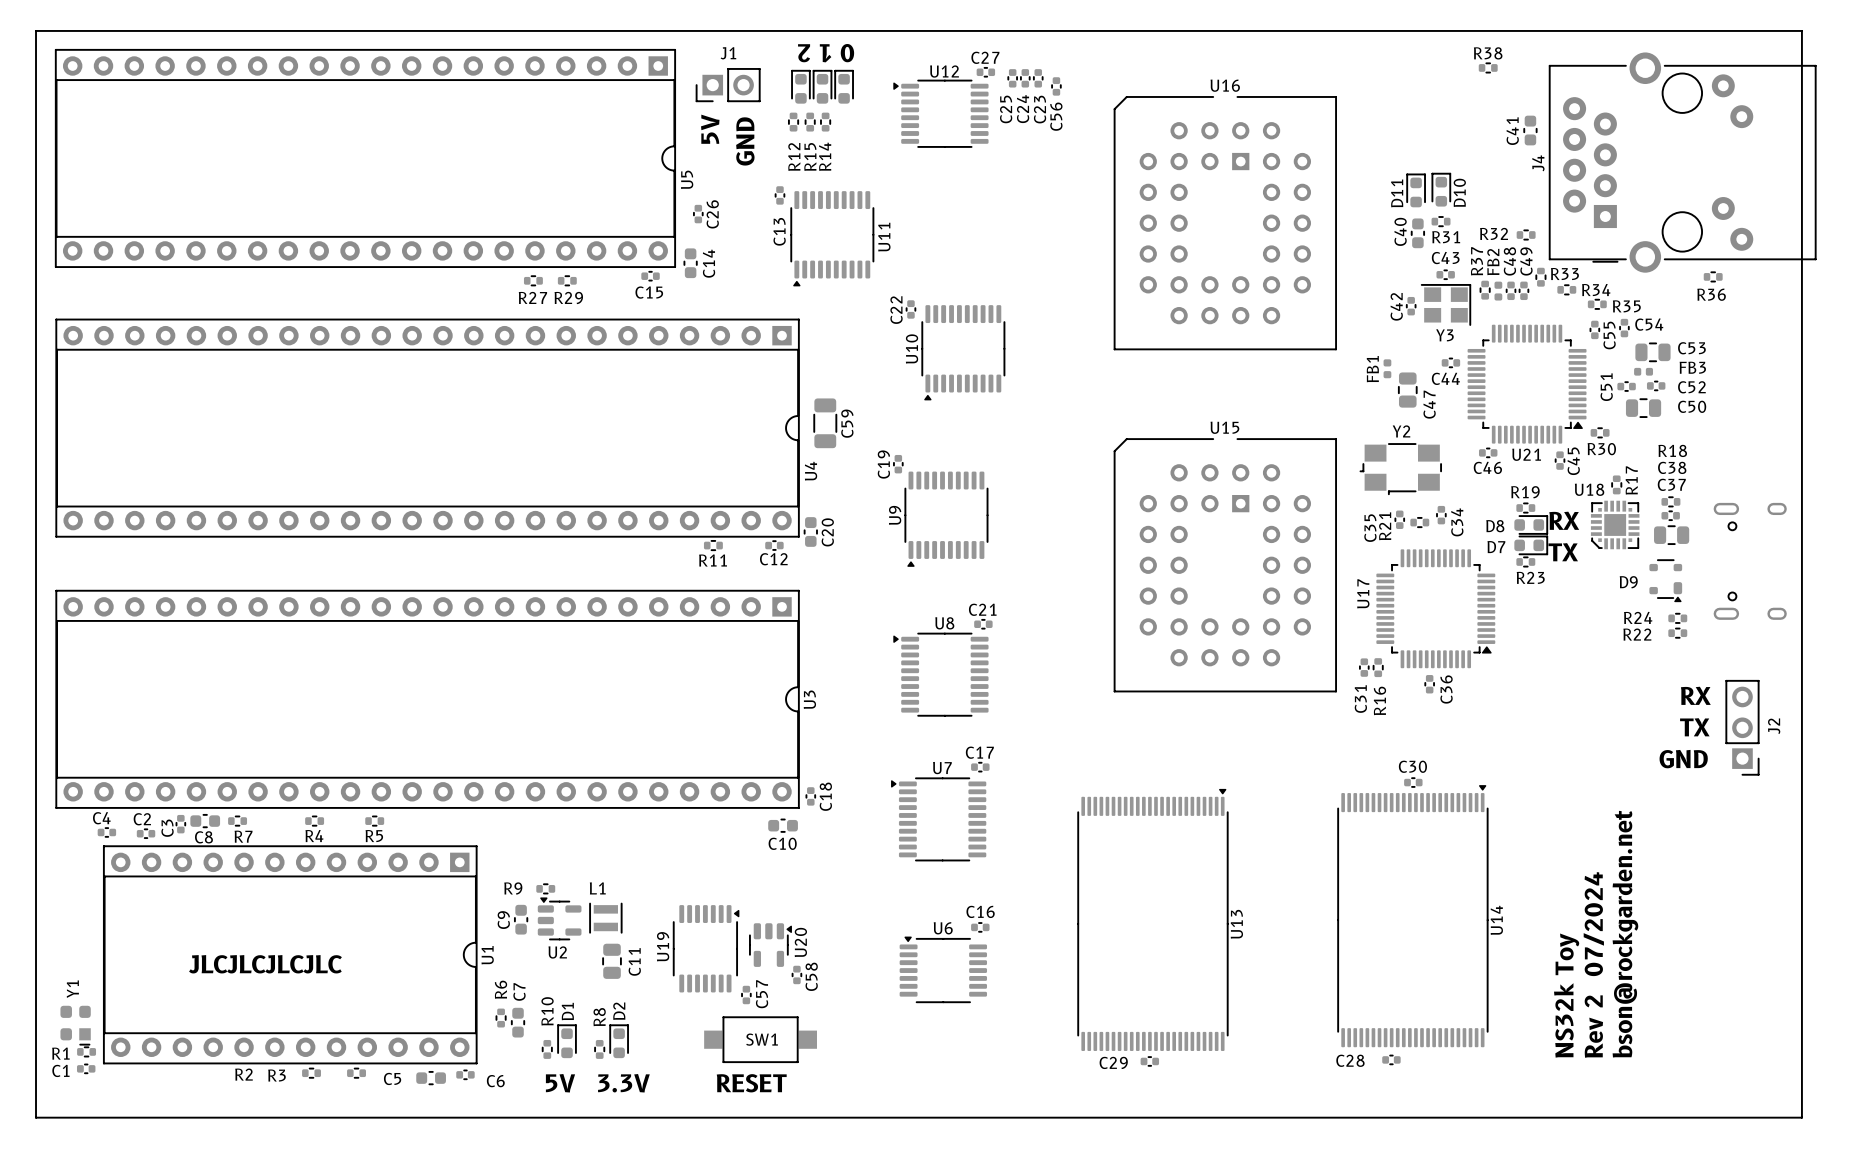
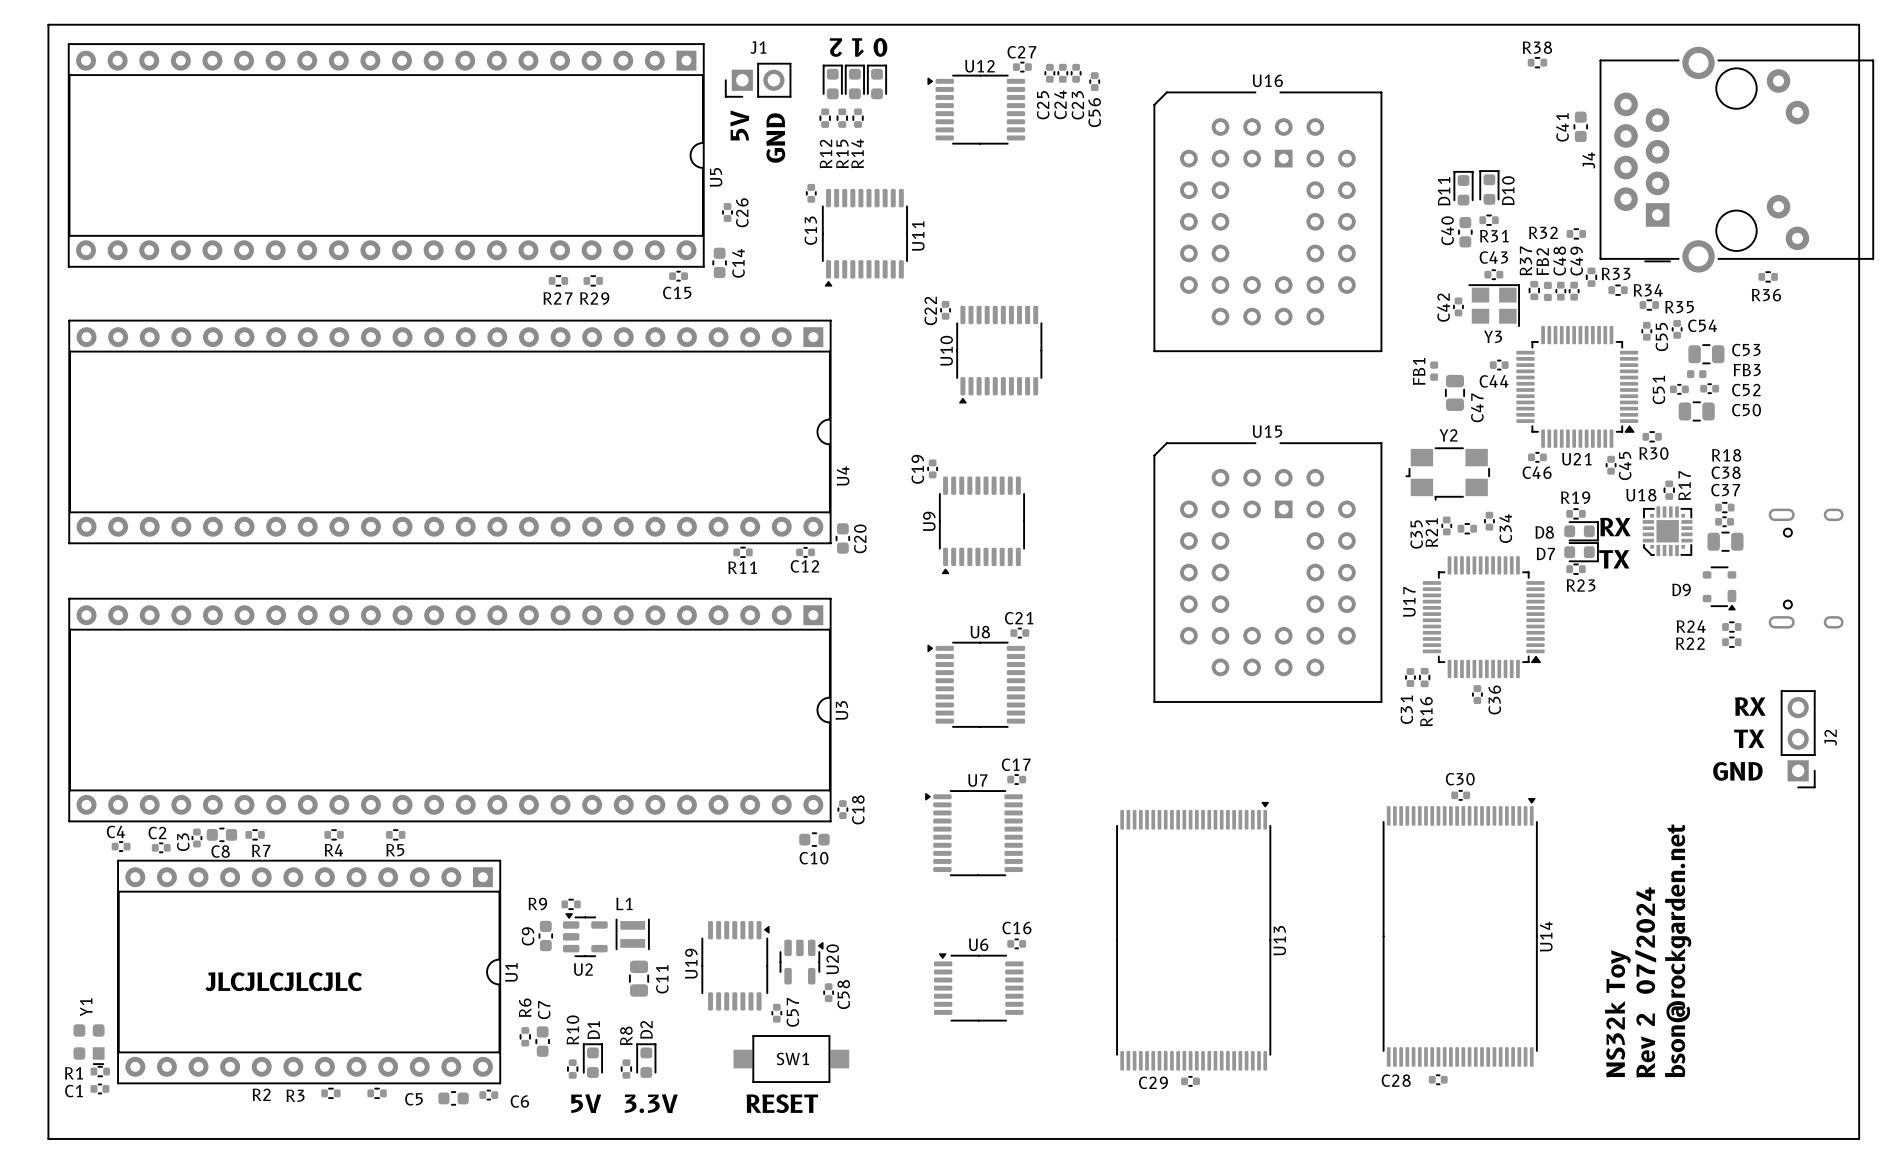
C59: (825, 423) -> none

